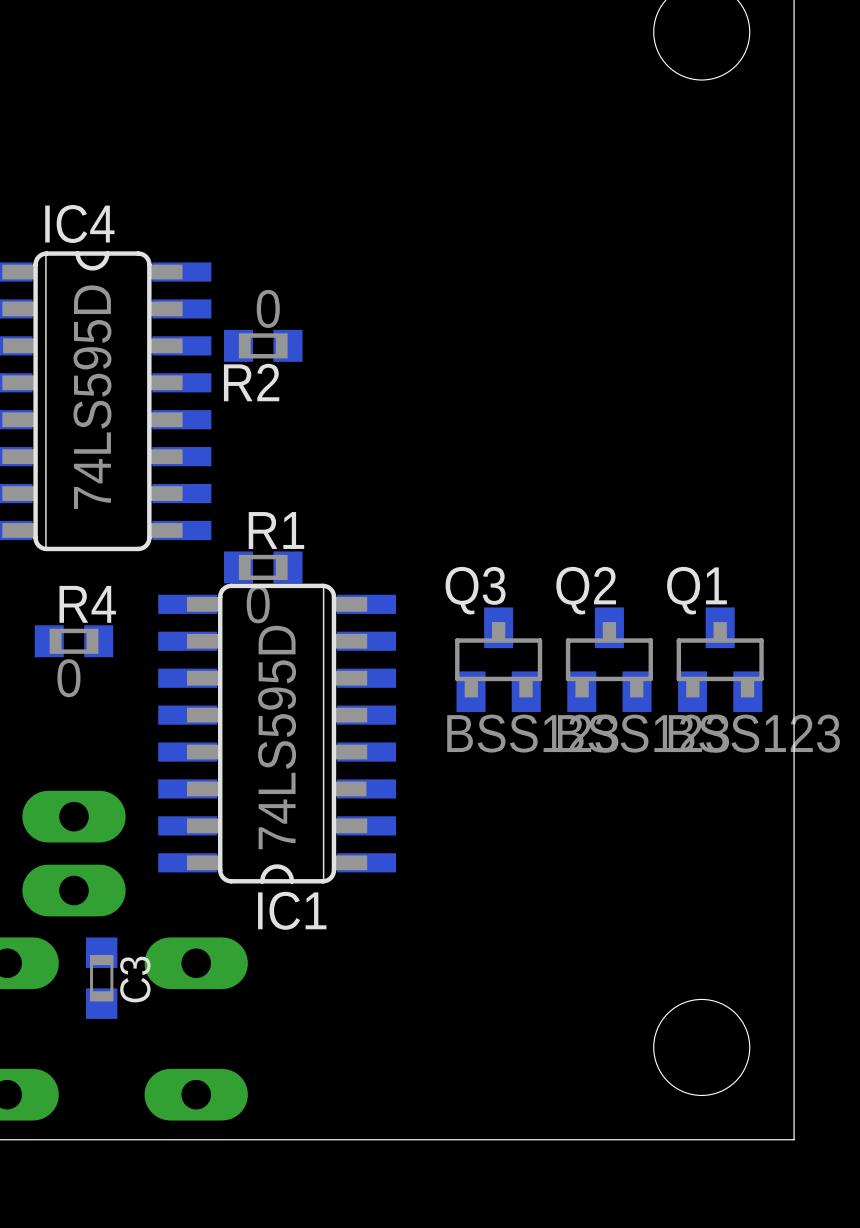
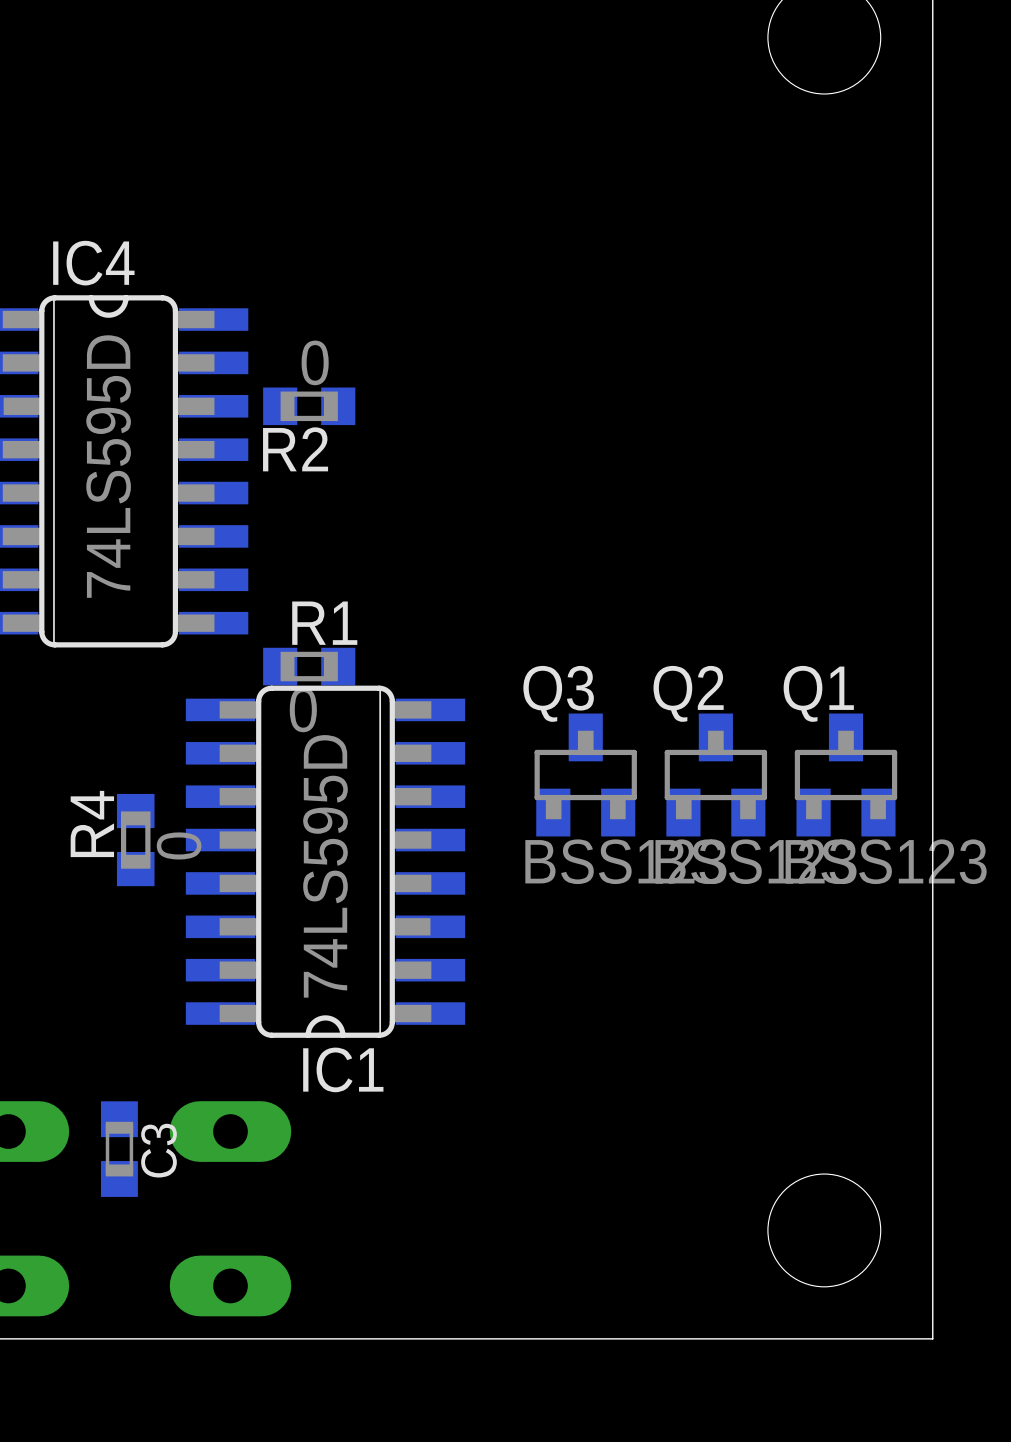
R4 name position: R4 (87, 604) -> R4 (92, 823)
R4 rotation: 0° (74, 641) -> 90° clockwise (135, 840)
R4 position: (74, 641) -> (135, 840)
part: (74, 853) -> none

